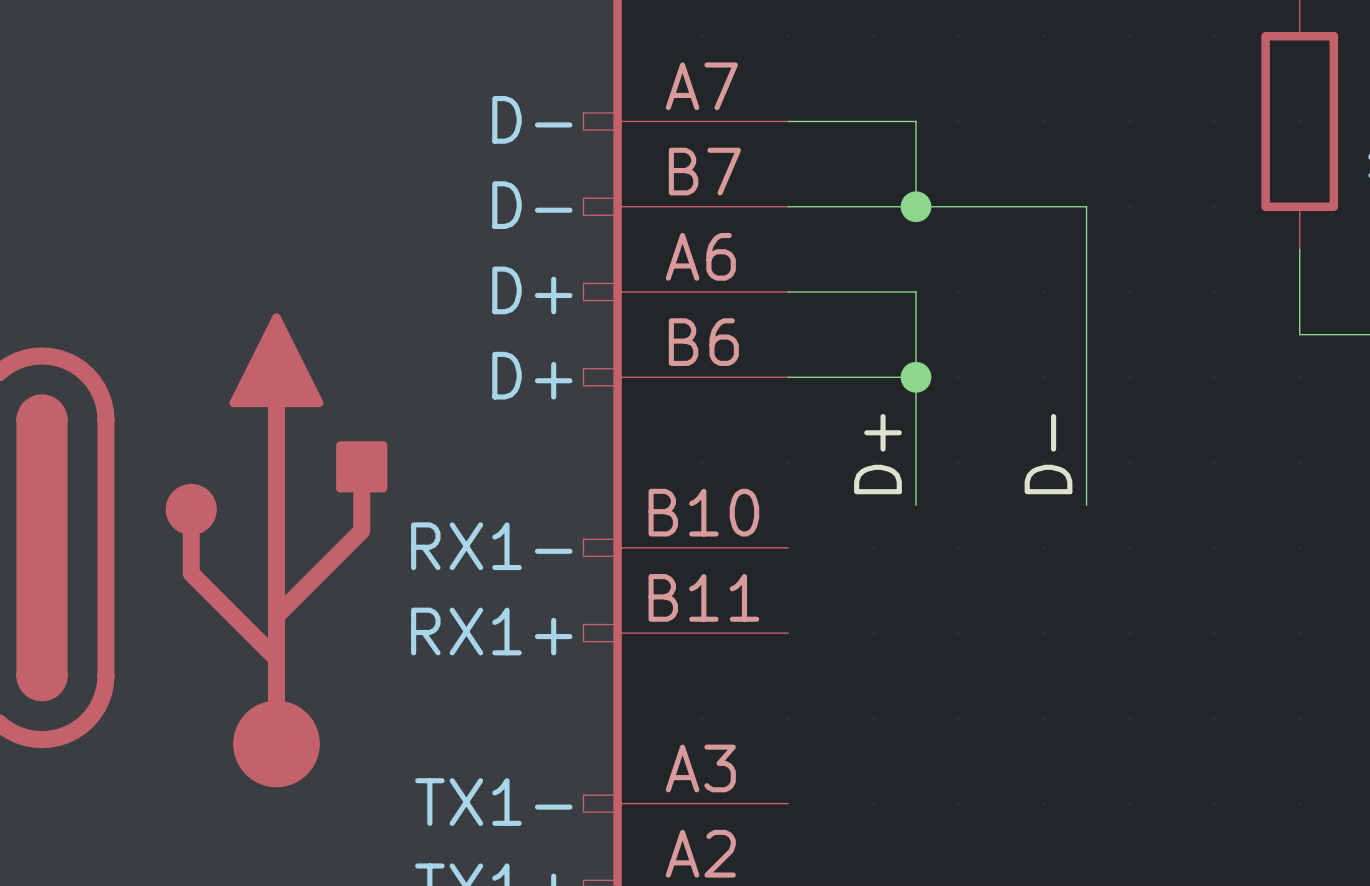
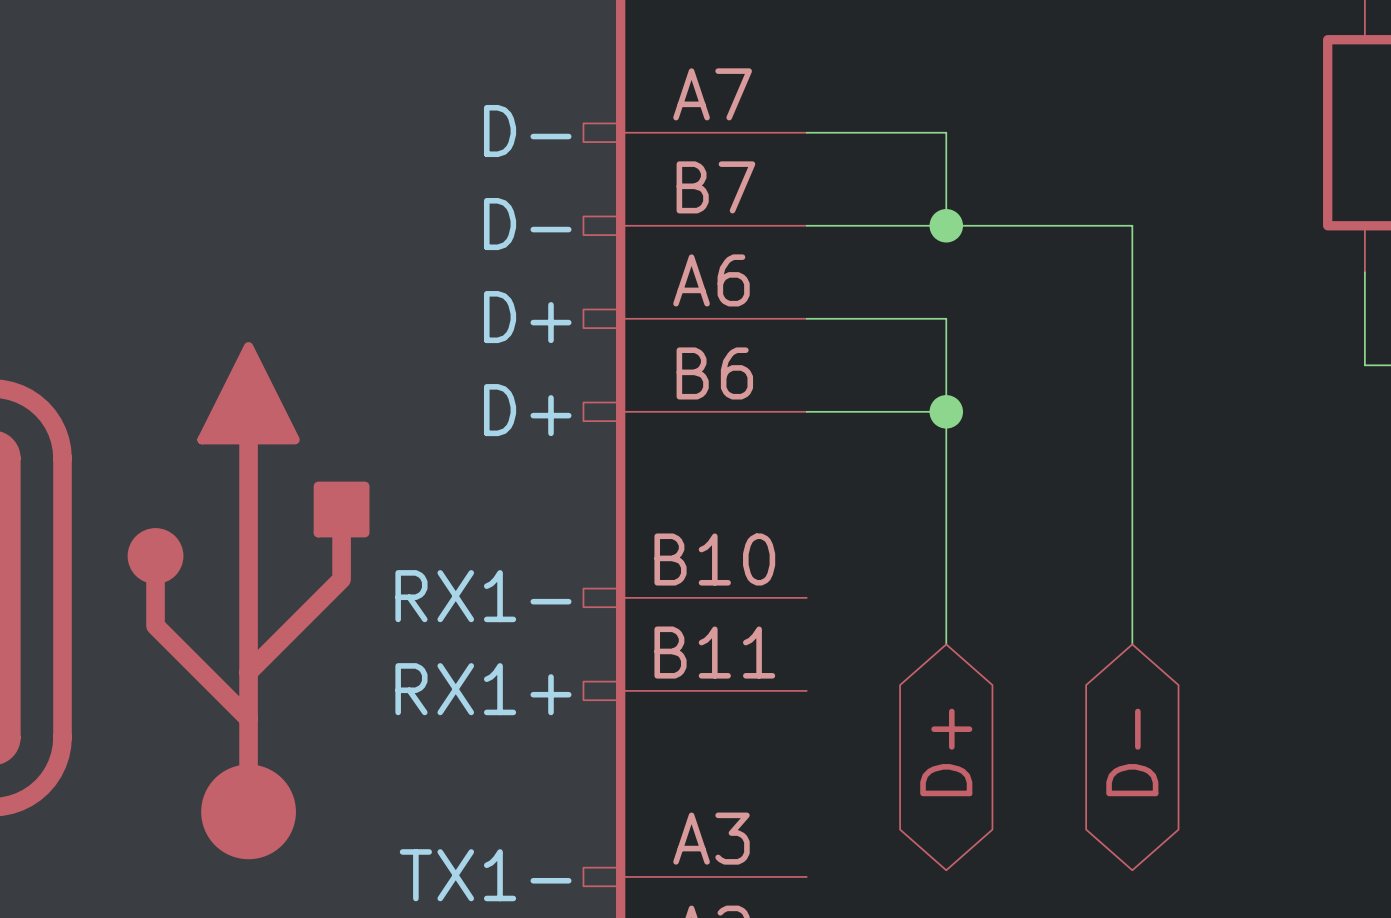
label: D+ (877, 454) -> none
label: D- (1048, 454) -> none
wire: none -> (946, 551) (946, 644)
wire: none -> (1132, 551) (1132, 644)
global label: none -> D+ (946, 752)
global label: none -> D- (1132, 752)

